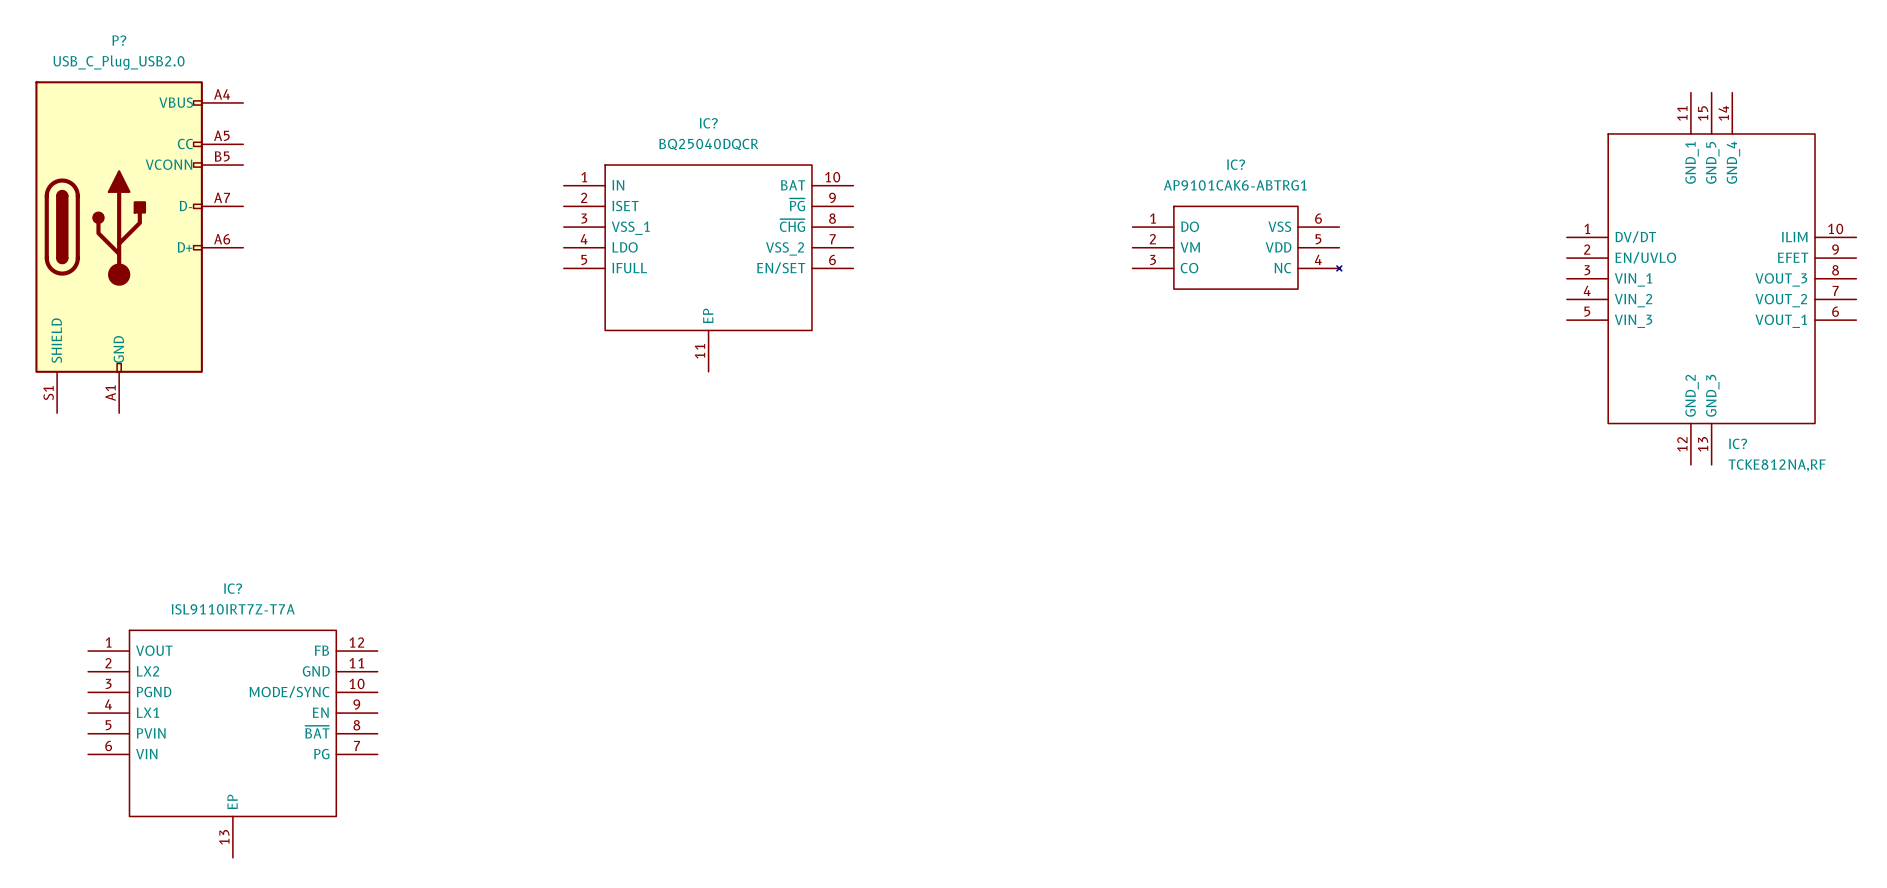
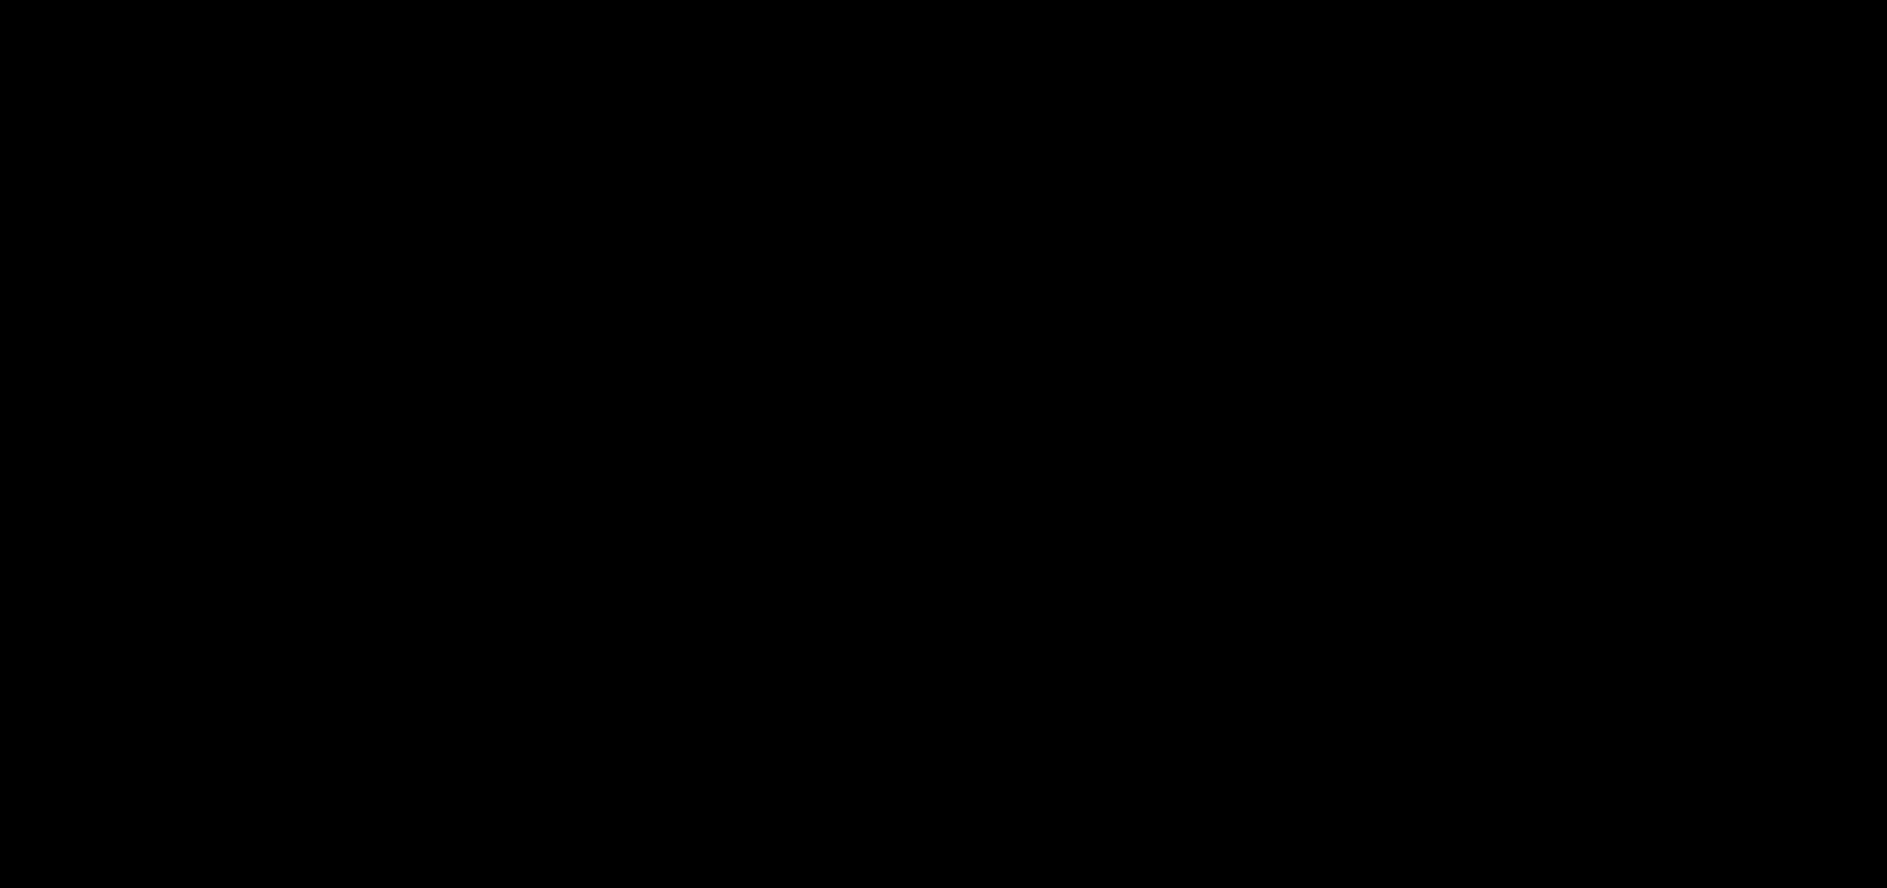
P?: USB_C_Plug_USB2.0 (139, 247) -> none
IC?: AP9101CAK6-ABTRG1 (1237, 247) -> none
IC?: BQ25040DQCR (708, 268) -> none
IC?: TCKE812NA,RF (1711, 278) -> none
IC?: ISL9110IRT7Z-T7A (232, 743) -> none

